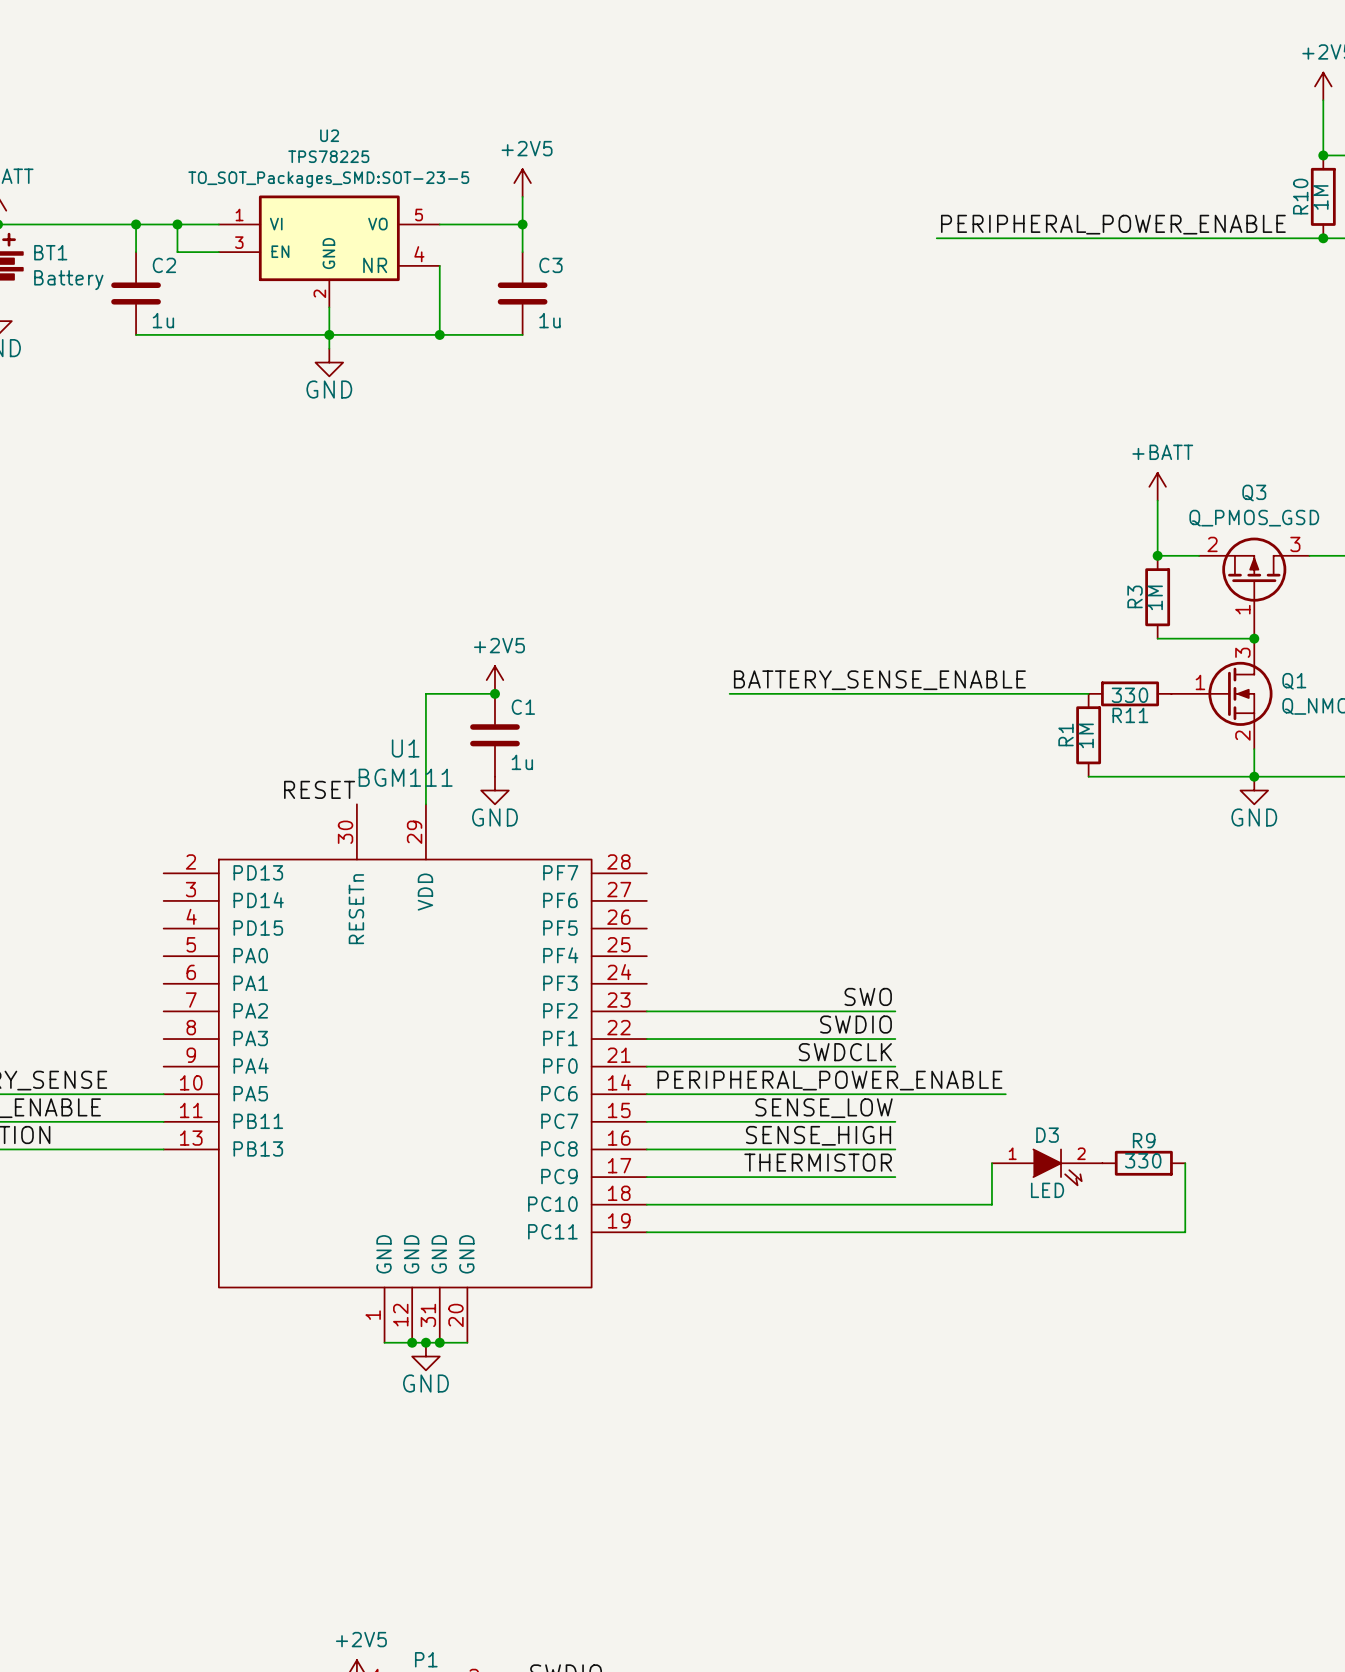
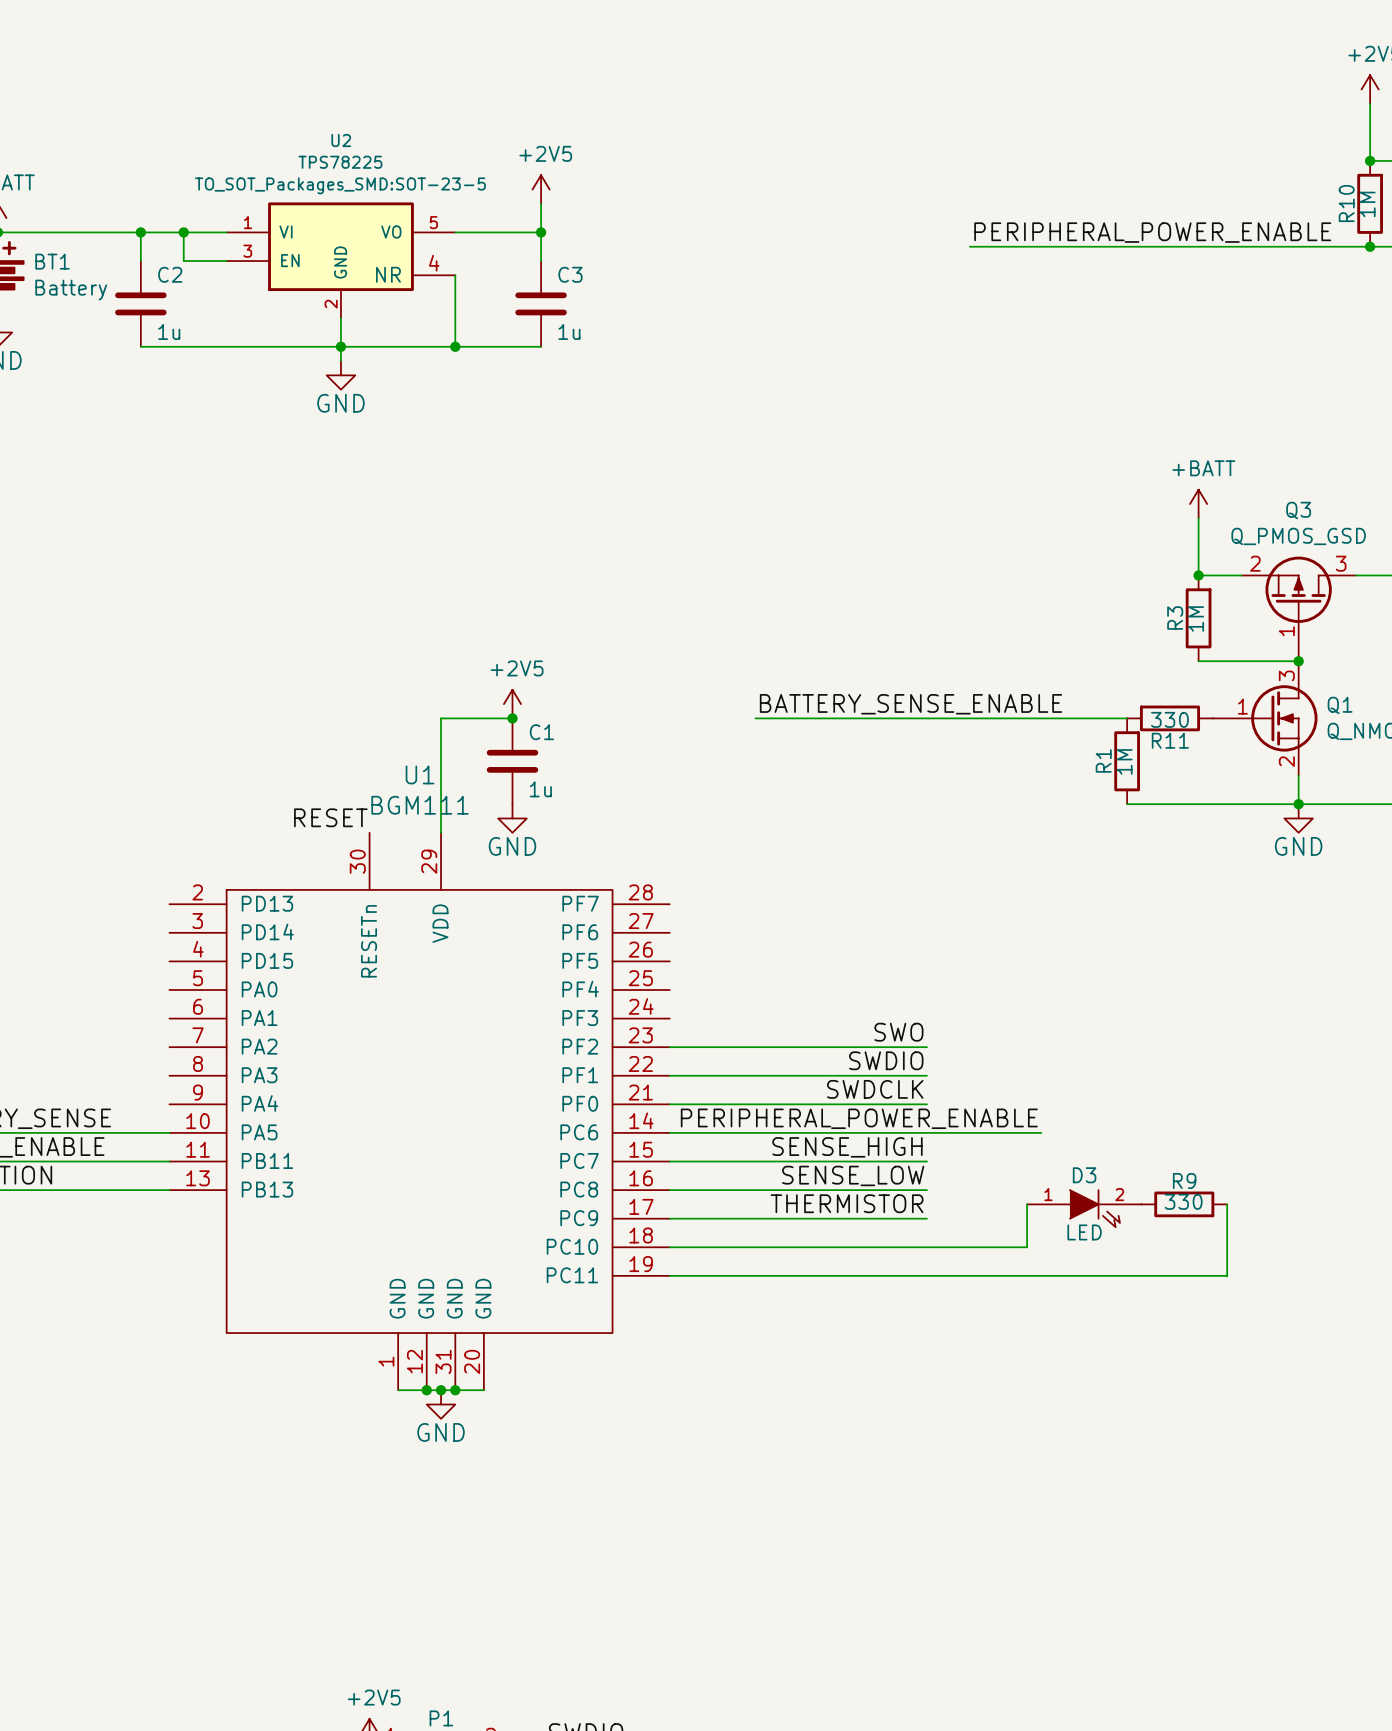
label: SENSE_LOW (824, 1108) -> SENSE_HIGH (847, 1147)
label: SENSE_HIGH (818, 1135) -> SENSE_LOW (853, 1175)

